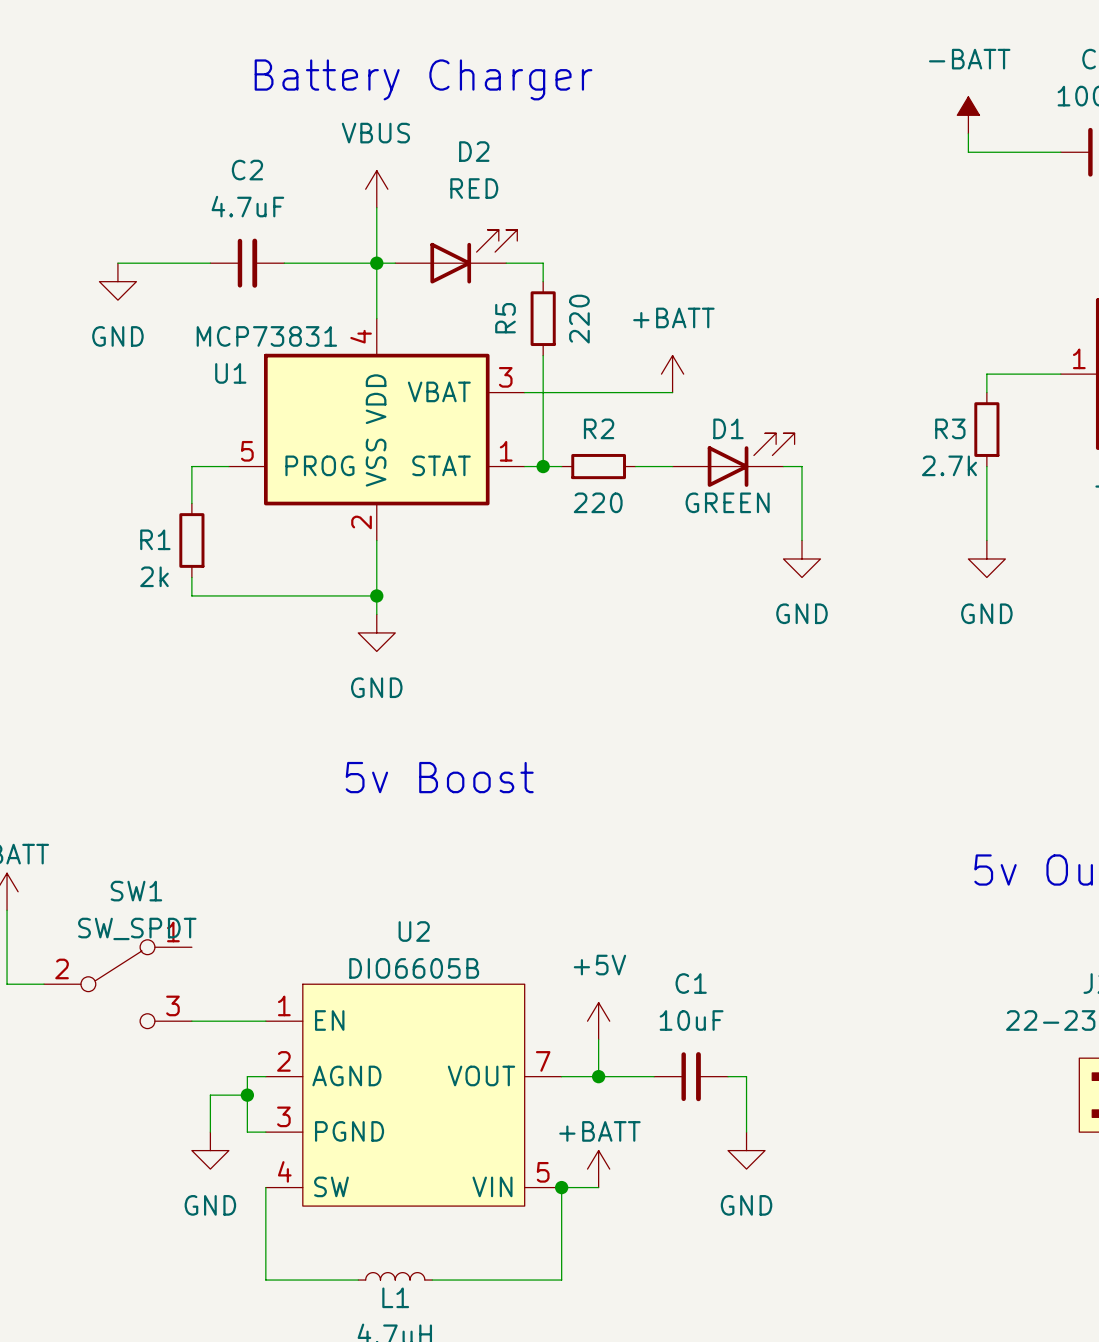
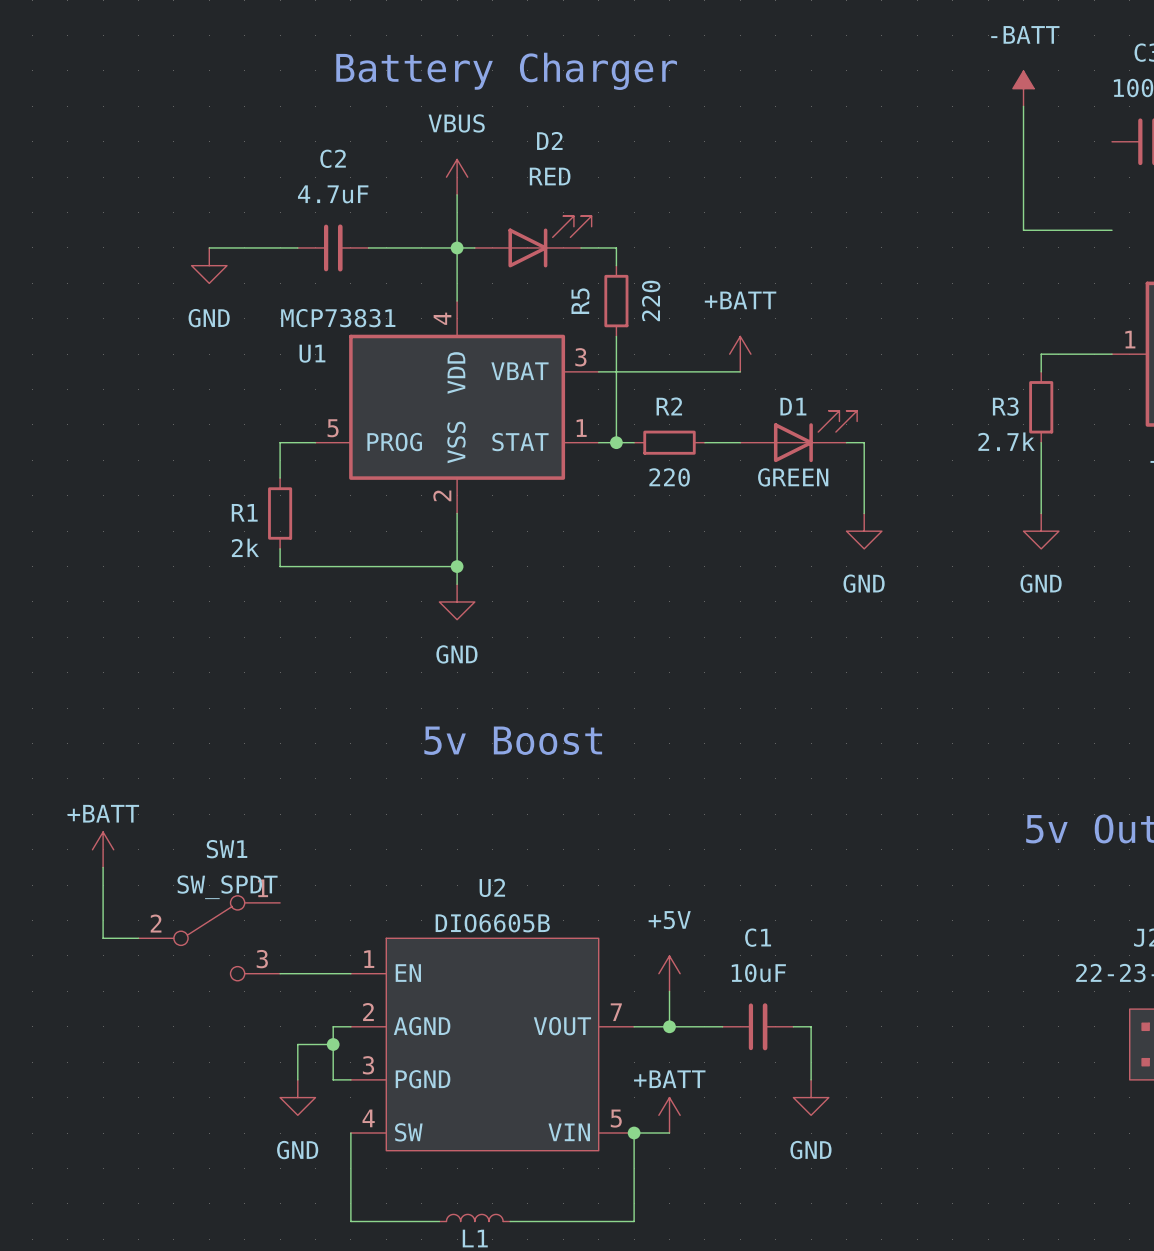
power symbol position: -BATT (968, 115) -> -BATT (1023, 88)
wire: (968, 152) (1060, 152) -> (1023, 141) (1023, 230) (1112, 230)

